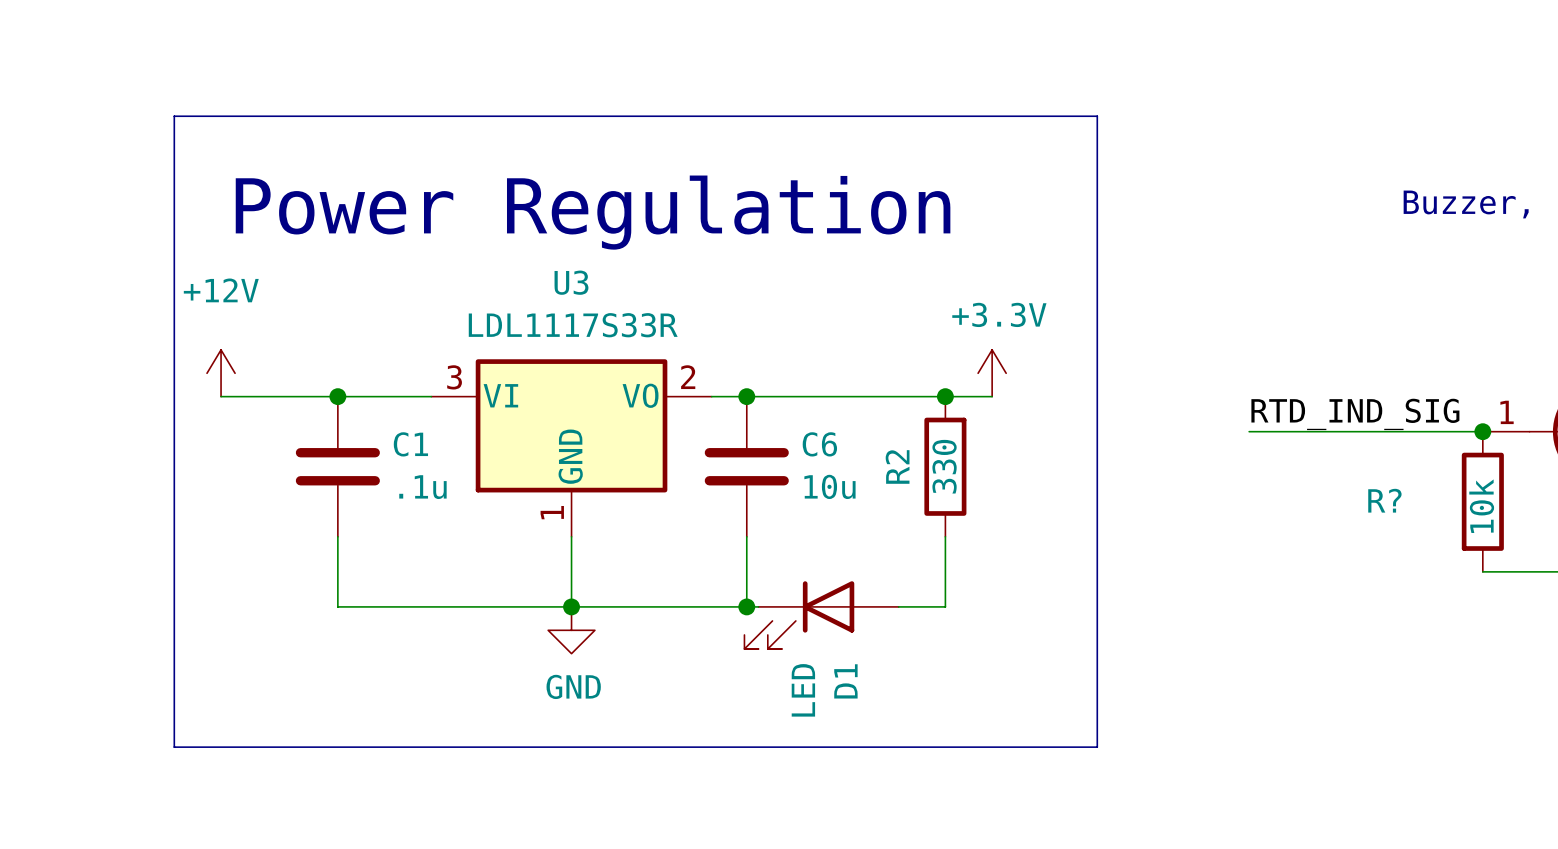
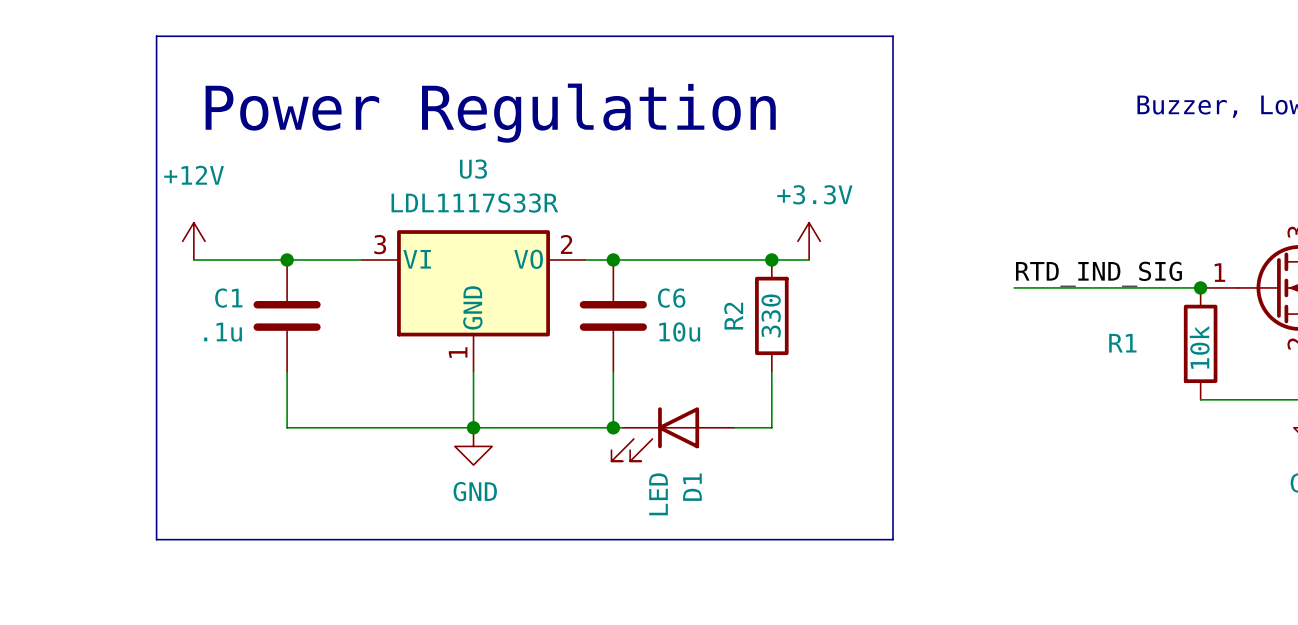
C1 name position: C1 (410, 444) -> C1 (228, 298)
C1 value position: .1u (422, 487) -> .1u (223, 332)
R? name: R? (1384, 500) -> R1 (1122, 343)

